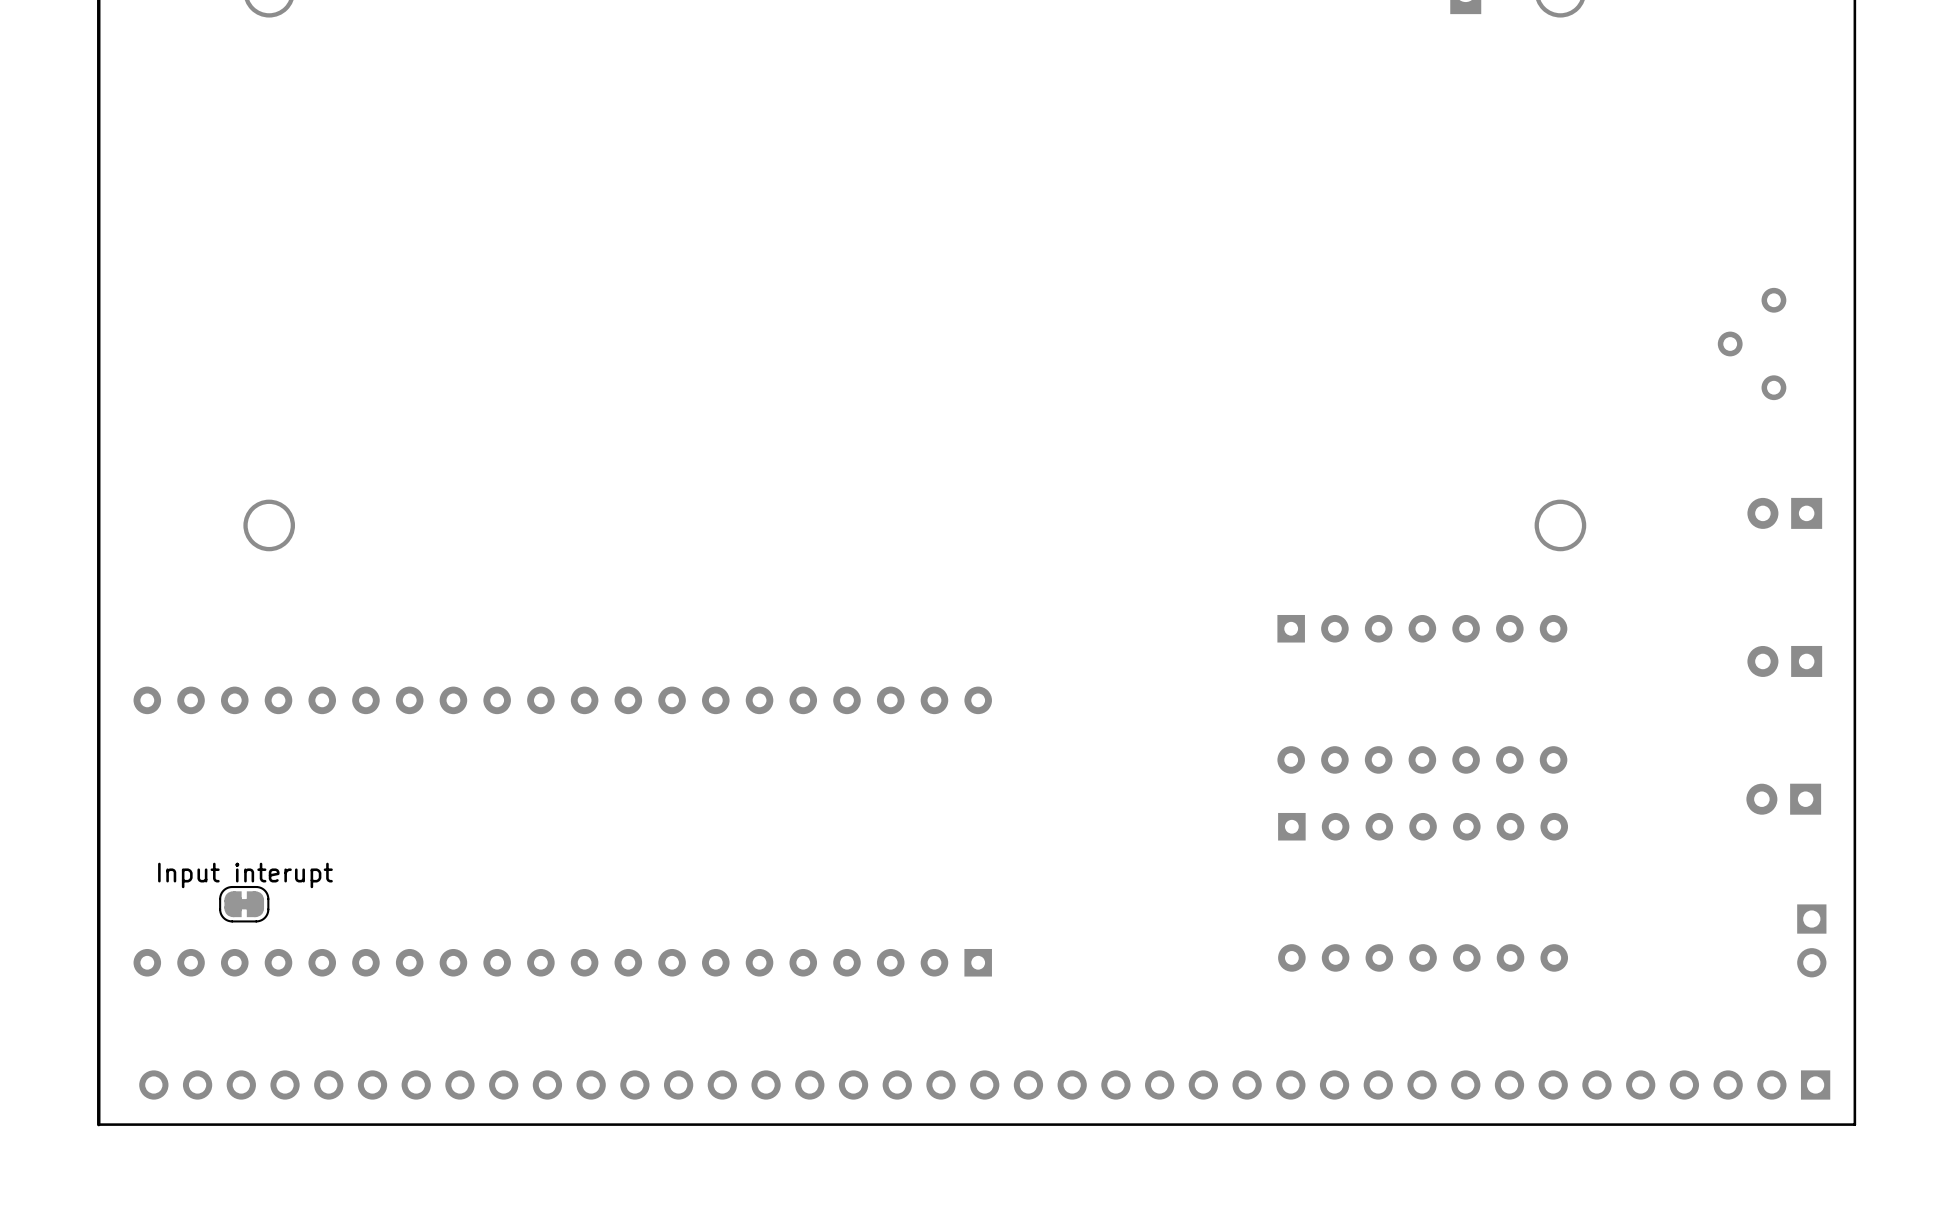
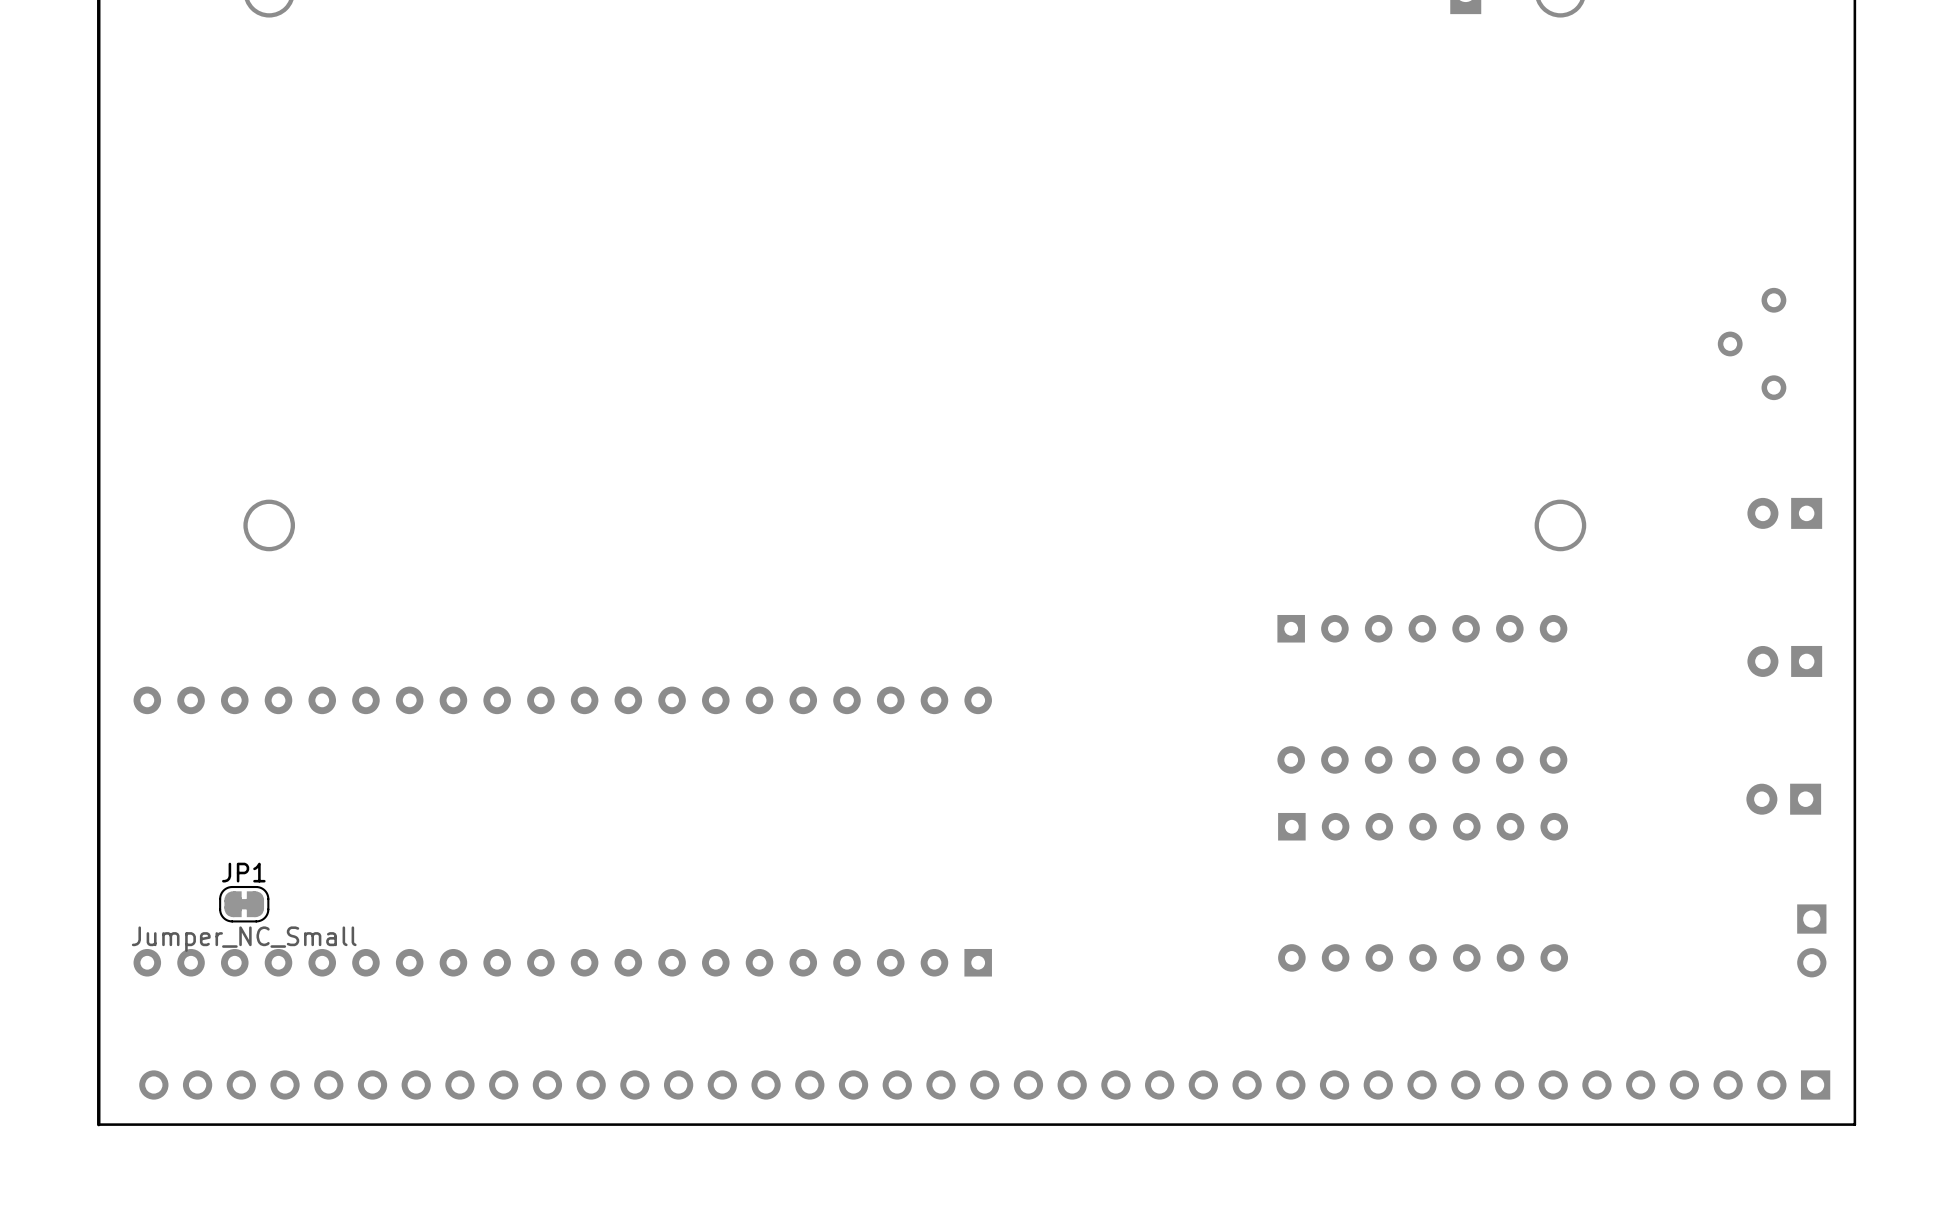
Input interupt name: Input interupt (245, 875) -> JP1 (243, 872)
Input interupt value: none -> Jumper_NC_Small (244, 939)

